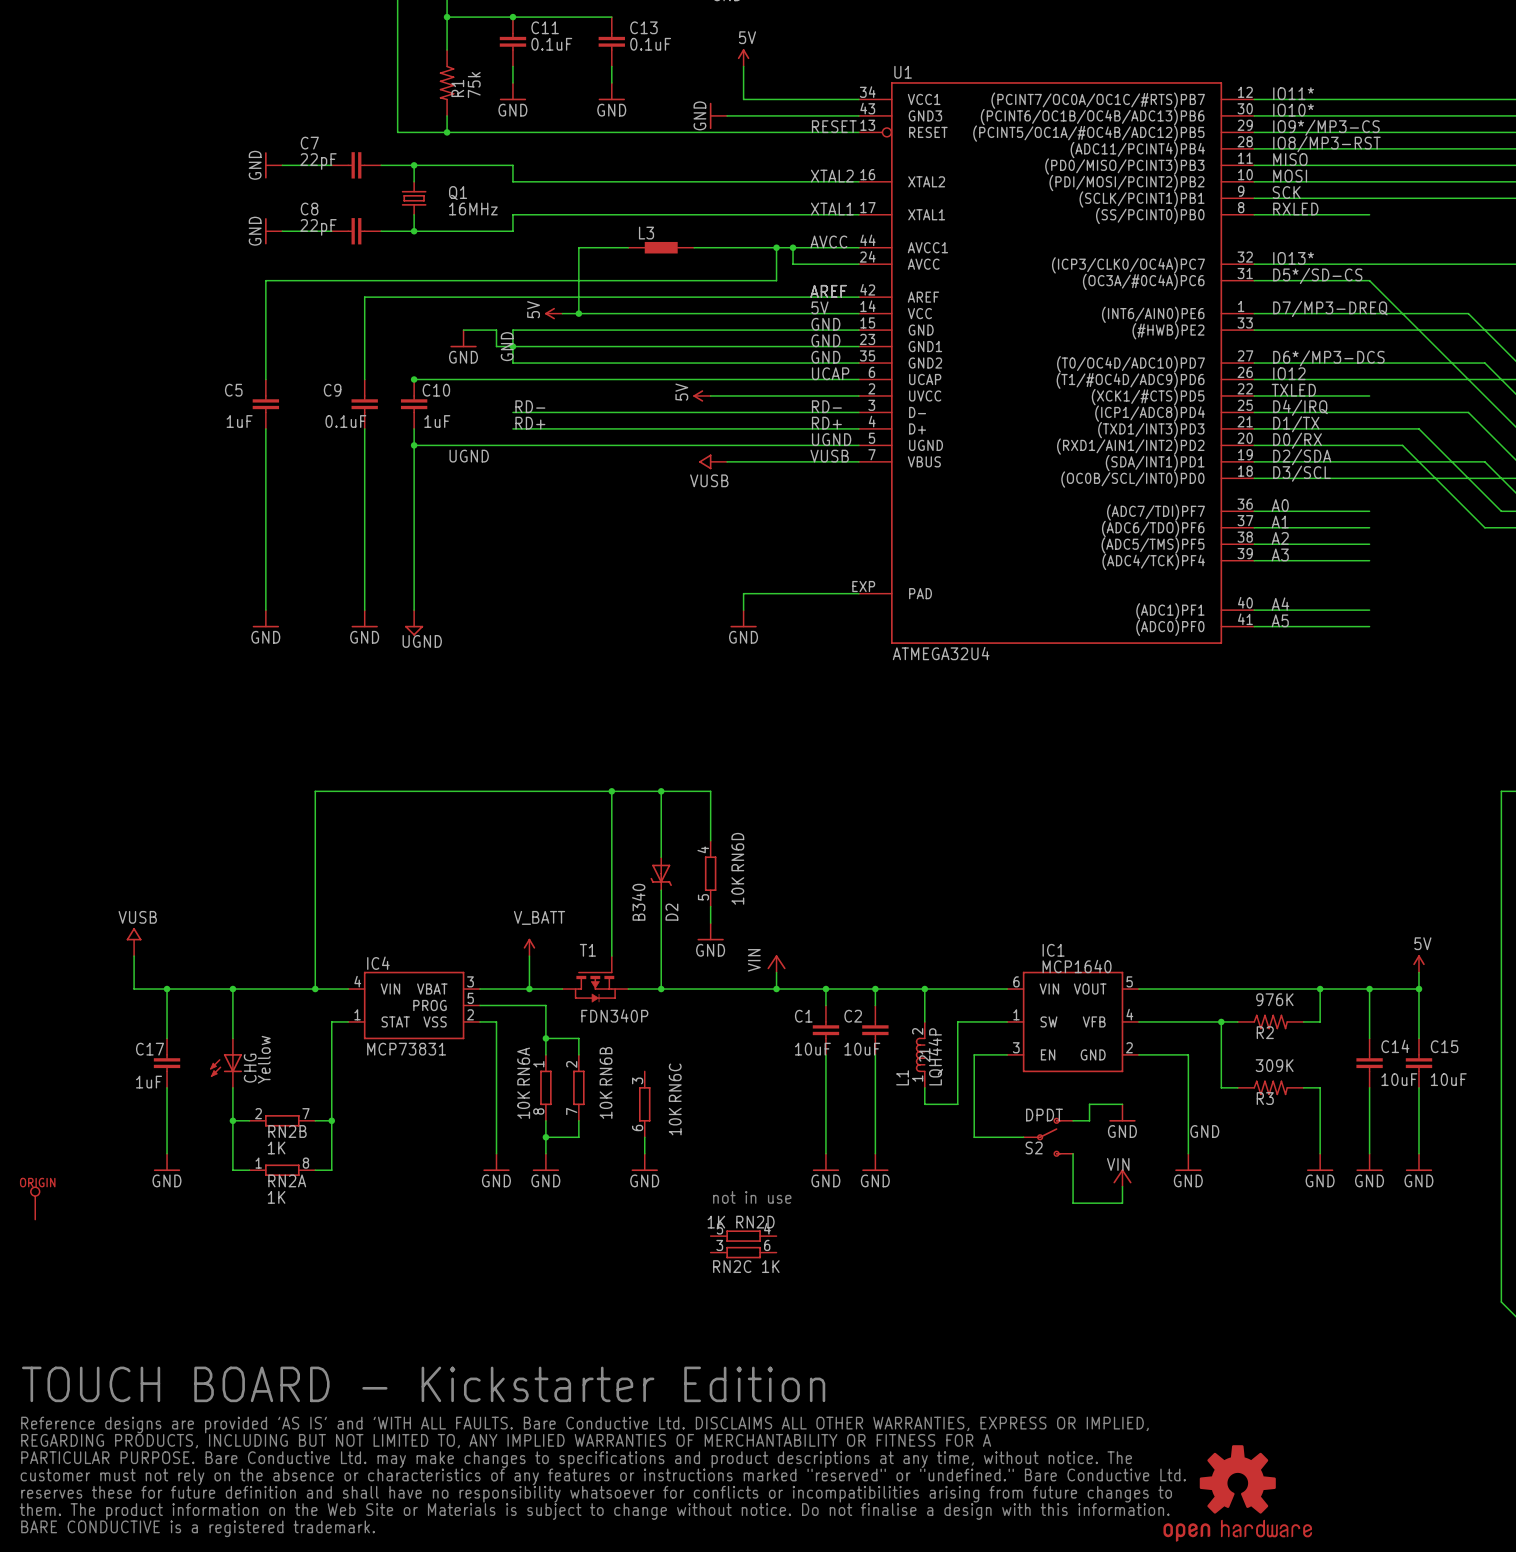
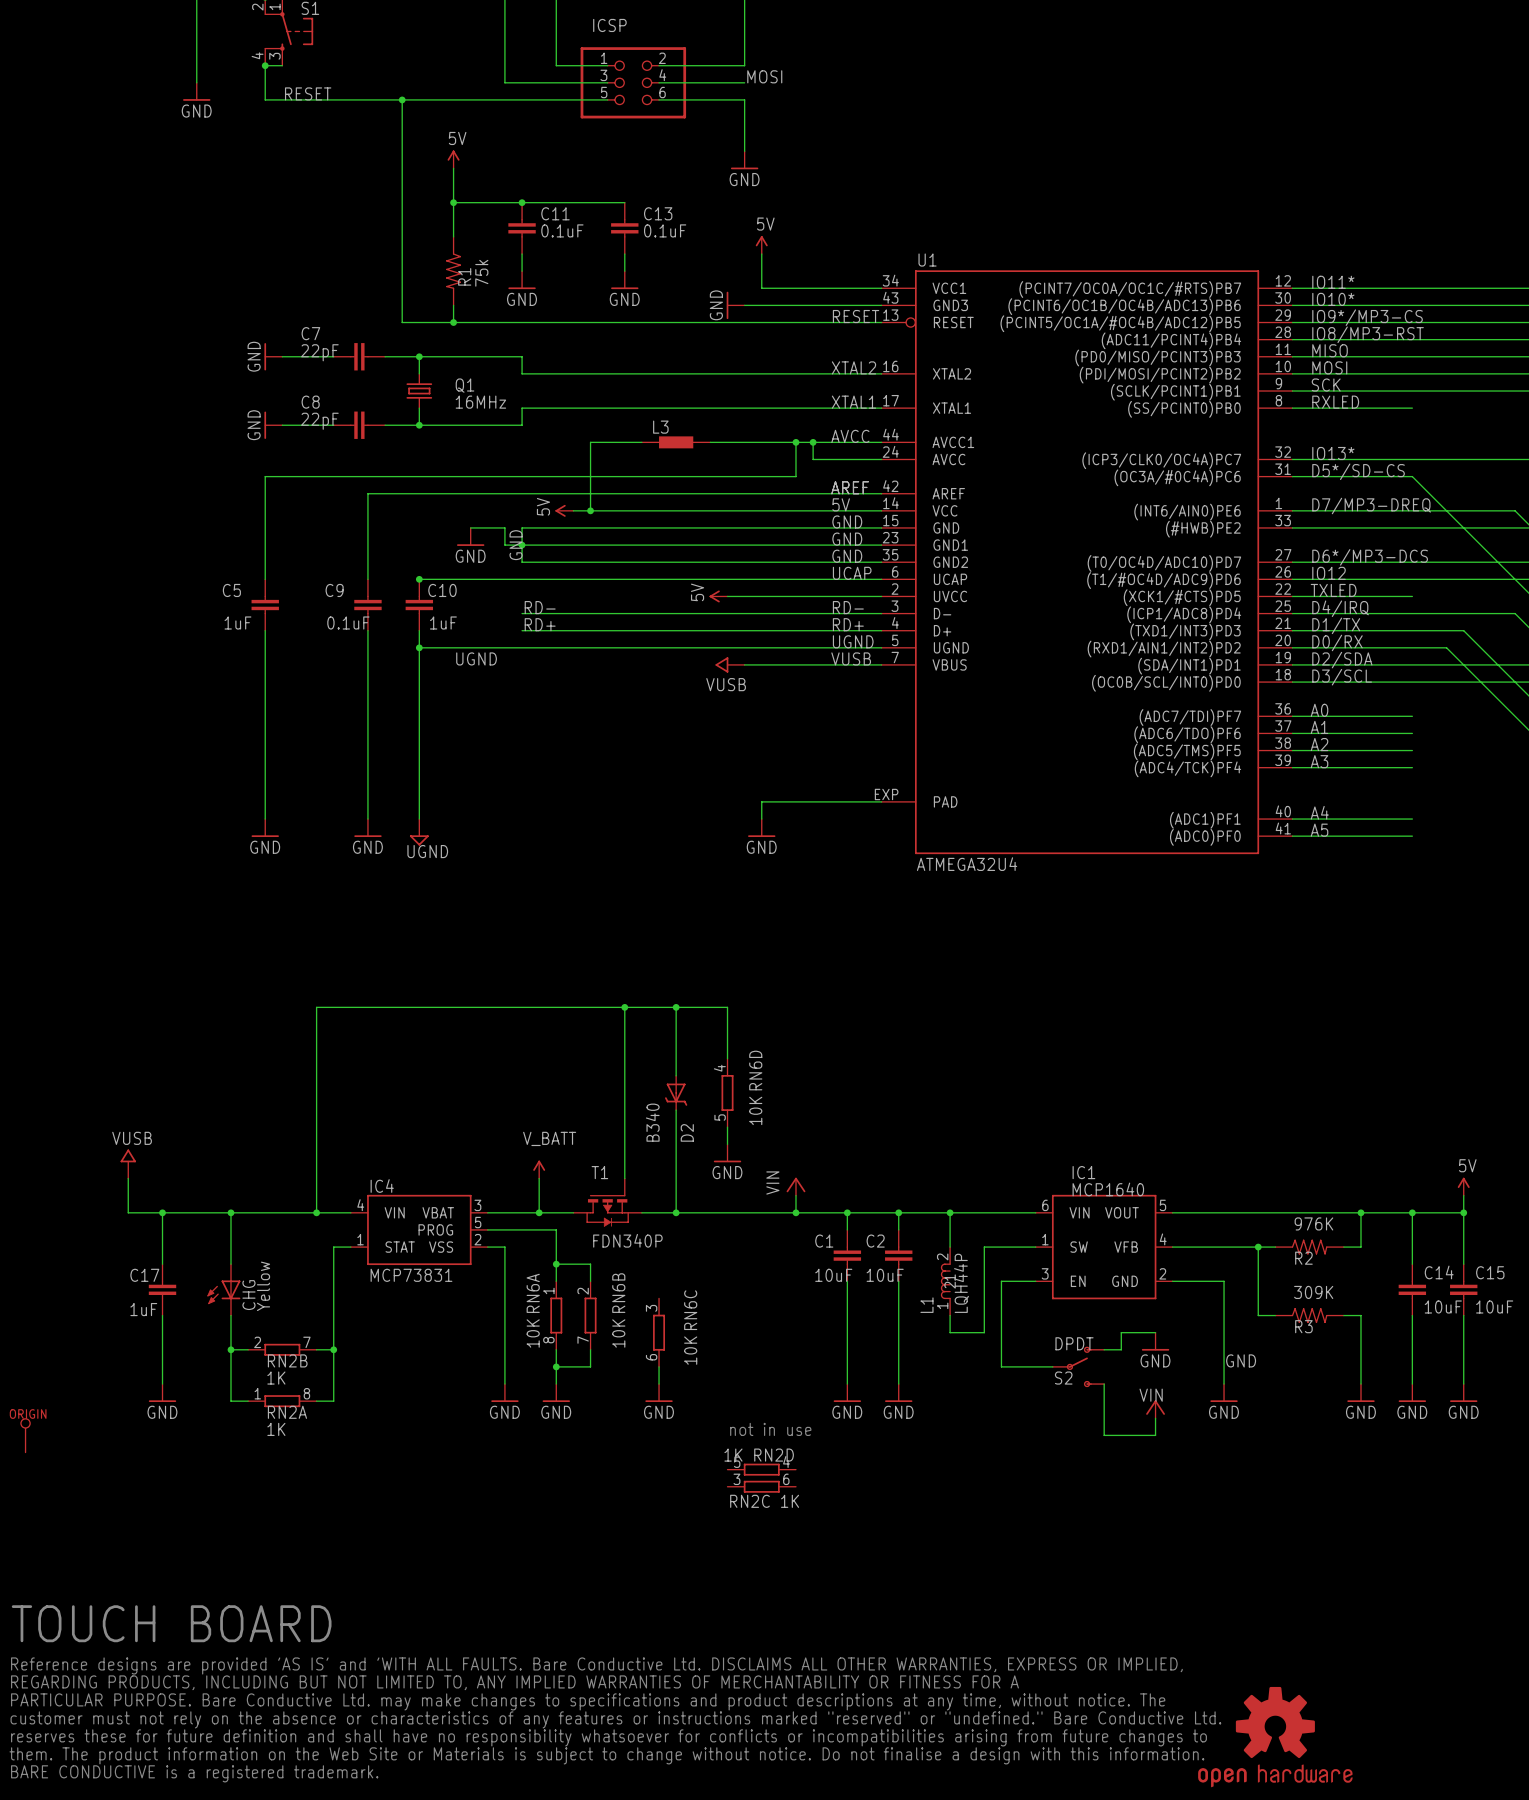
text: TOUCH BOARD - Kickstarter Edition (423, 1384) -> TOUCH BOARD (171, 1623)

